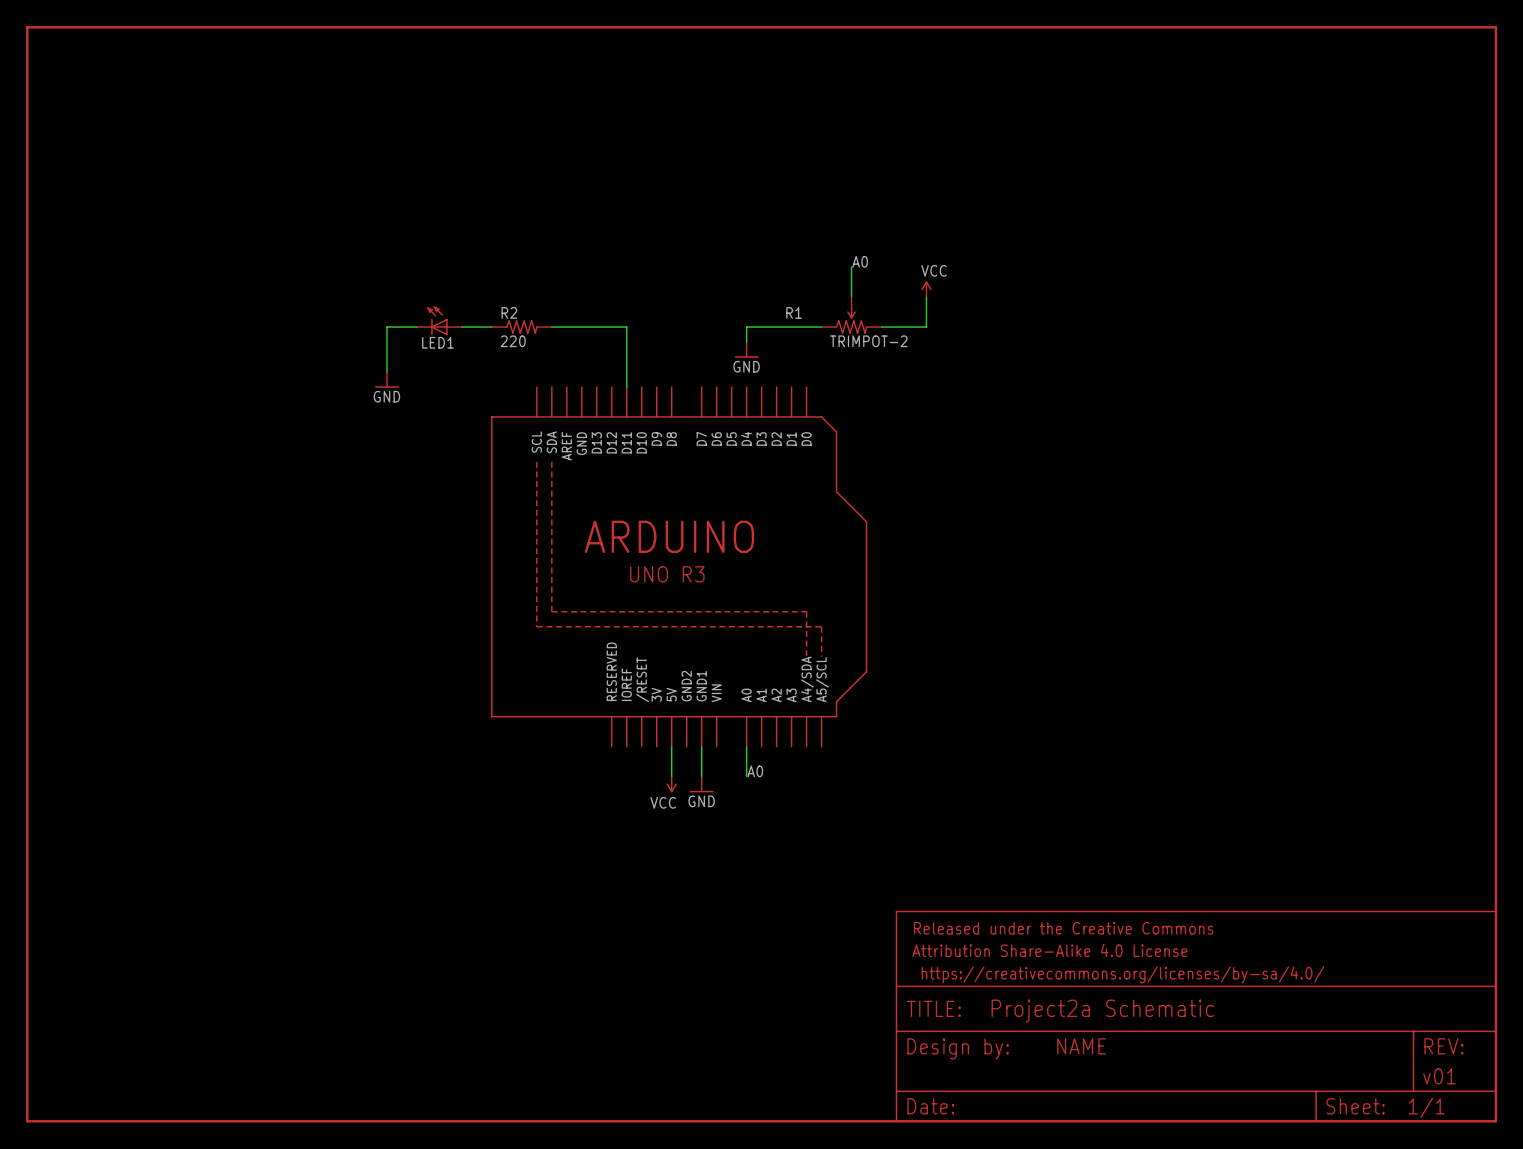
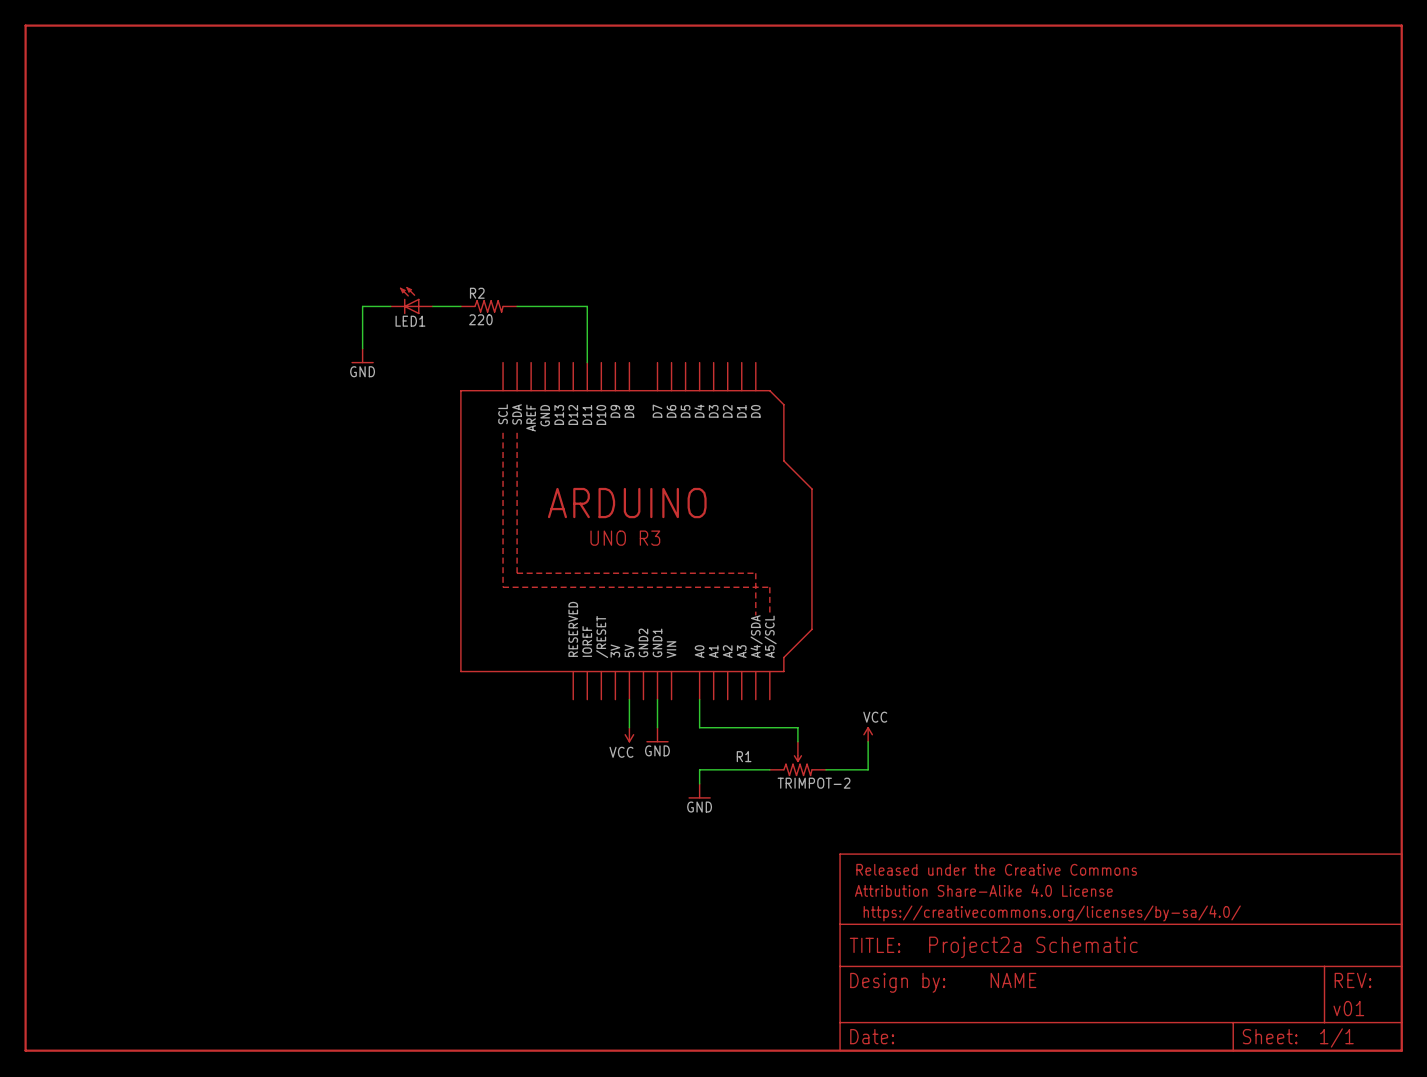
label: A0 (860, 261) -> none
wire: (851, 267) (851, 297) -> none
power symbol: VCC (926, 289) -> none
wire: (926, 297) (926, 327) (881, 327) -> none
R1 position: (851, 315) -> (797, 758)
wire: (821, 327) (746, 327) (746, 342) -> none
power symbol: GND (746, 349) -> none
label: A0 (755, 771) -> none
wire: none -> (699, 727) (797, 727) (797, 741)
power symbol: none -> VCC (868, 734)
wire: none -> (868, 741) (868, 769) (826, 769)
wire: none -> (769, 769) (699, 769) (699, 783)
power symbol: none -> GND (699, 791)

